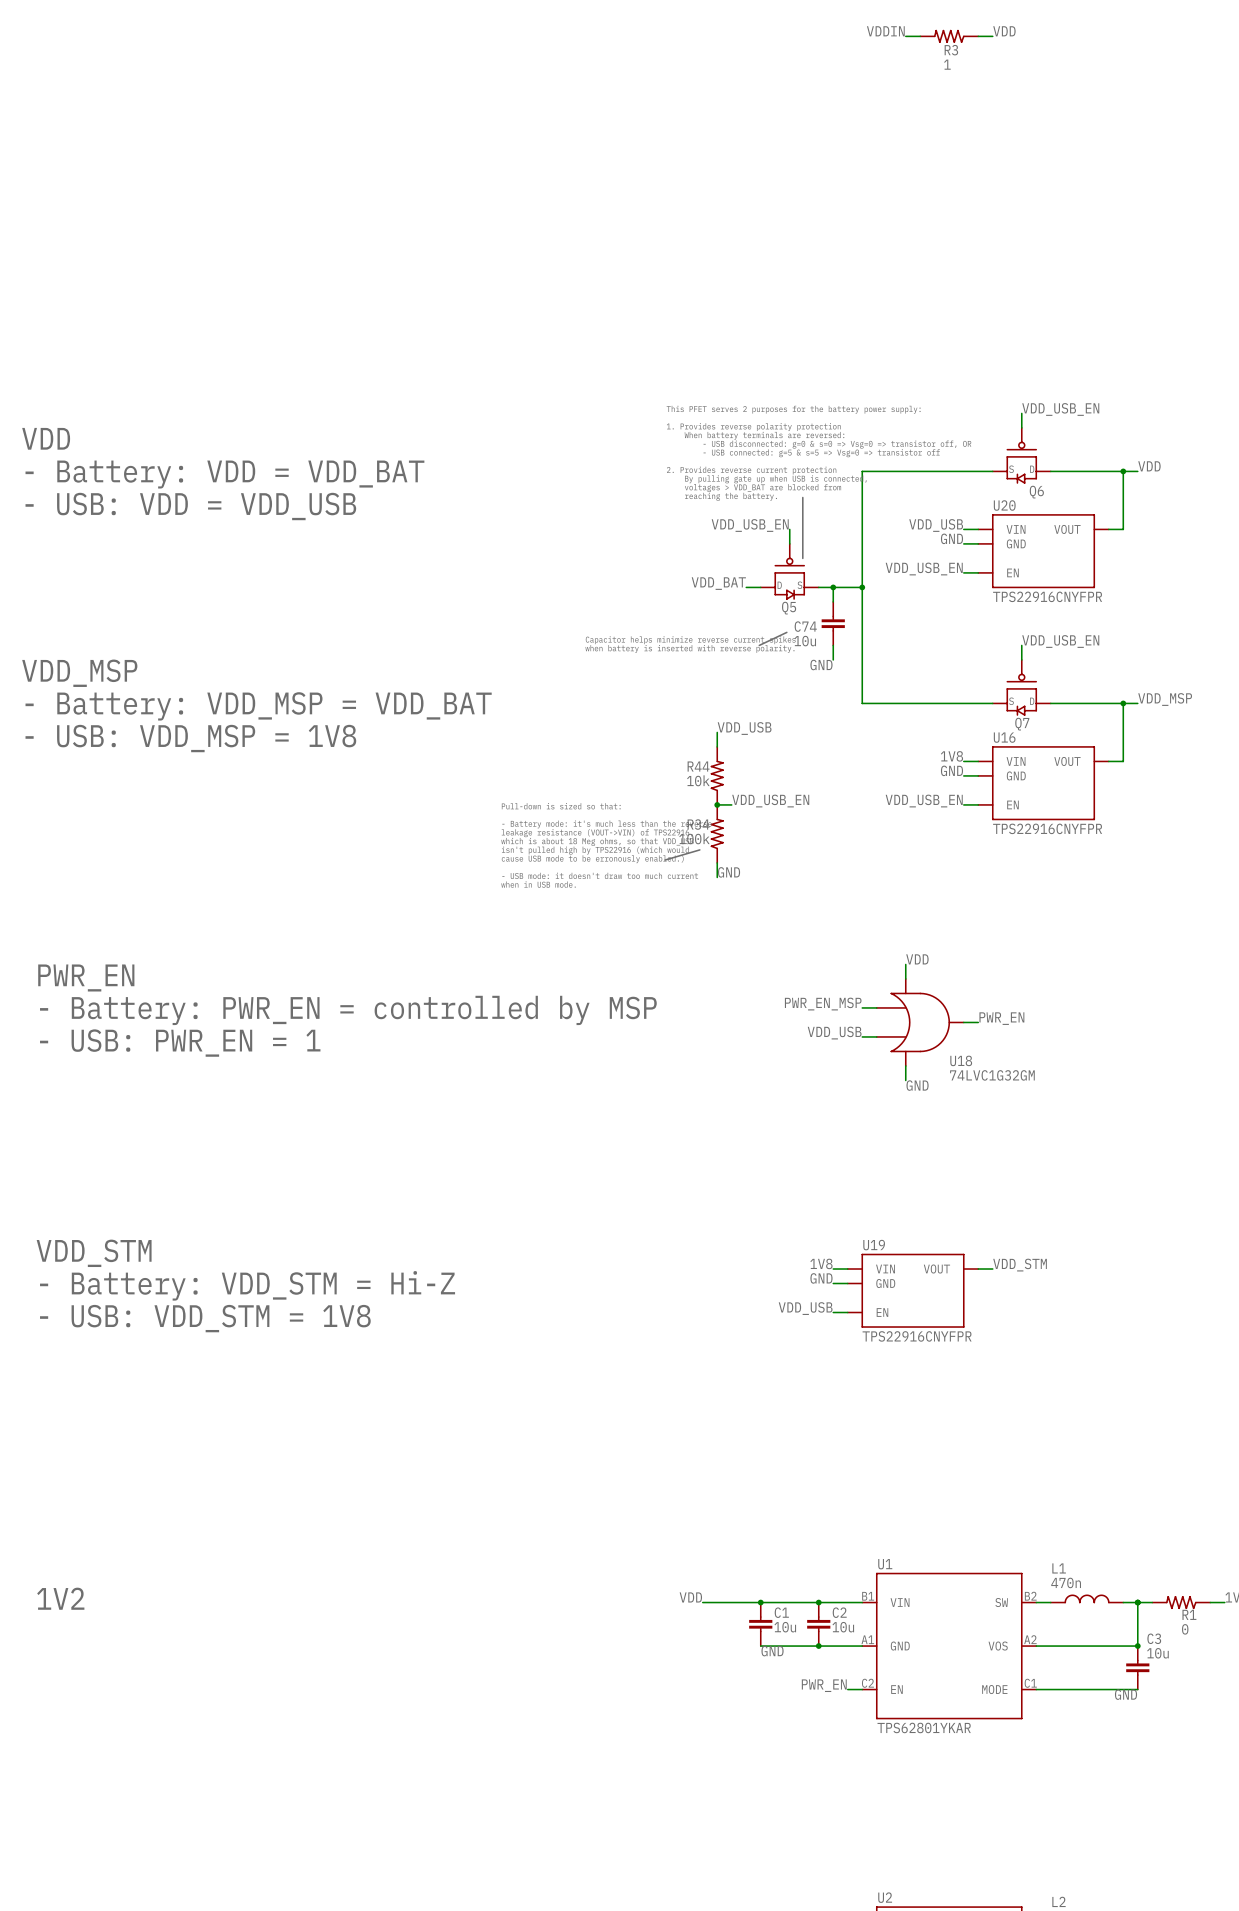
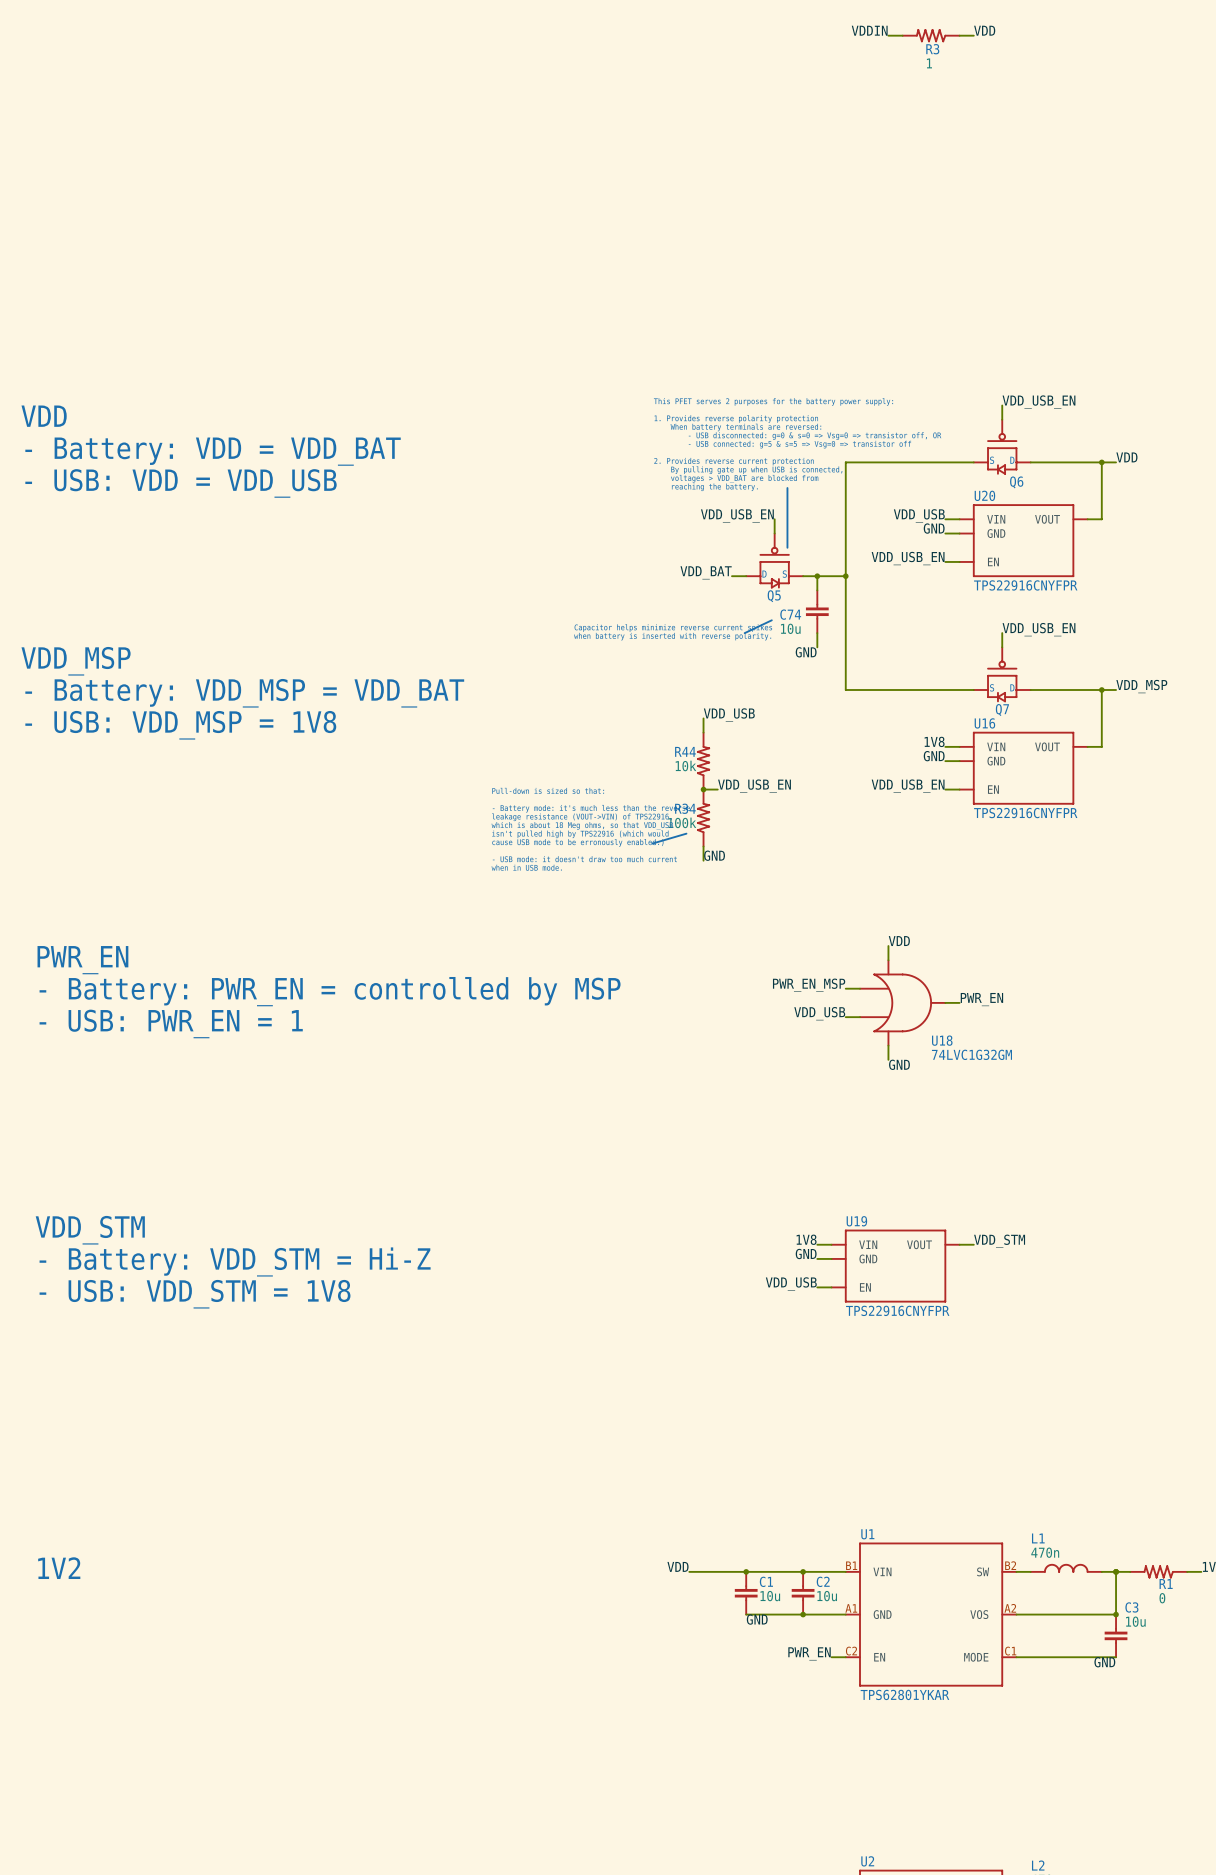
text position: VDD (46, 438) -> VDD (44, 416)
text position: - Battery: VDD = VDD_BAT (224, 474) -> - Battery: VDD = VDD_BAT (213, 451)
text position: - USB: VDD = VDD_USB (190, 506) -> - USB: VDD = VDD_USB (181, 483)

